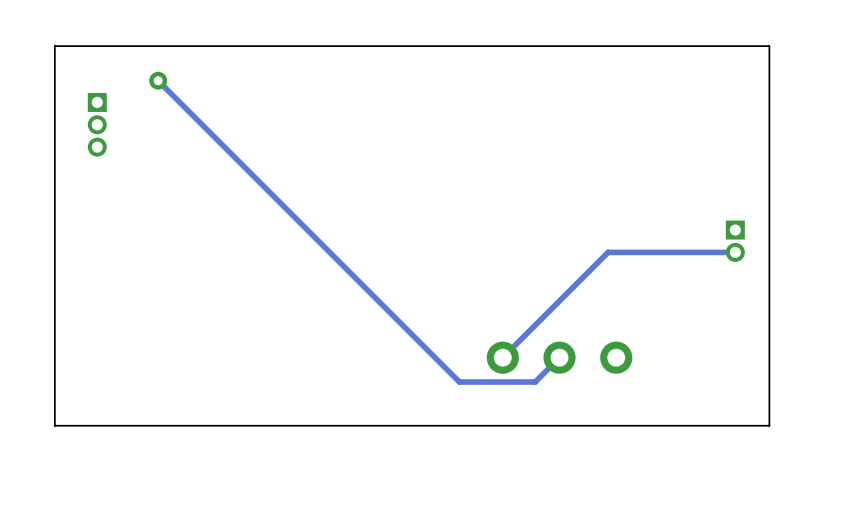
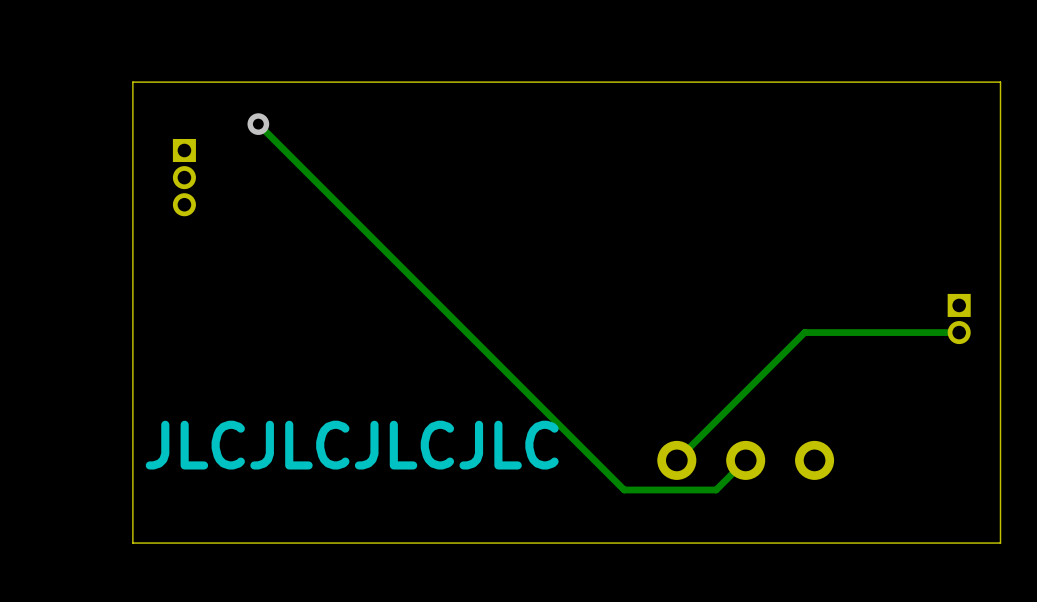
text: none -> JLCJLCJLCJLC (352, 445)

